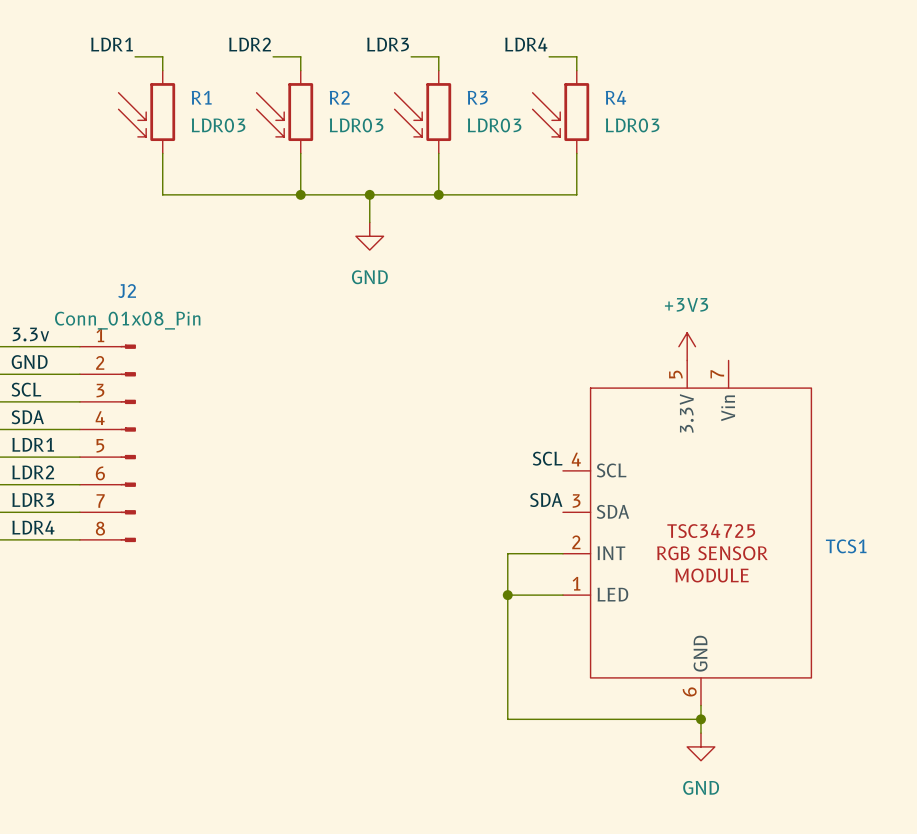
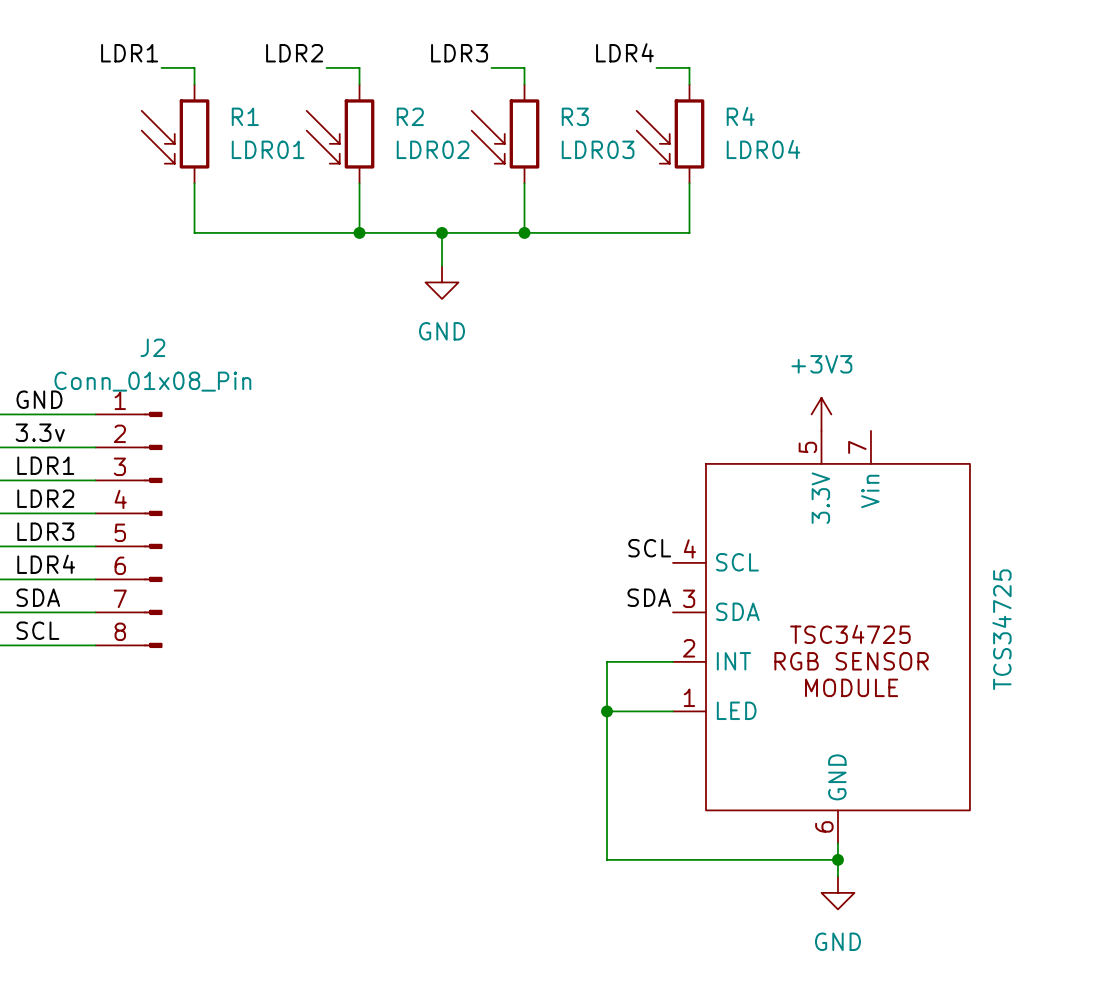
R1 value: LDR03 (218, 125) -> LDR01 (268, 149)
R2 value: LDR03 (356, 125) -> LDR02 (433, 149)
R4 value: LDR03 (632, 125) -> LDR04 (763, 149)
label: 3.3v (30, 334) -> GND (39, 399)
label: GND (29, 362) -> 3.3v (40, 432)
label: SCL (26, 389) -> LDR1 (45, 465)
label: SDA (27, 417) -> LDR2 (45, 498)
label: LDR1 (33, 444) -> LDR3 (45, 531)
label: LDR2 (33, 472) -> LDR4 (46, 564)
label: LDR3 (33, 499) -> SDA (38, 597)
label: LDR4 (33, 527) -> SCL (37, 630)
TCS1 name: TCS1 (846, 546) -> TCS34725 (1001, 629)

